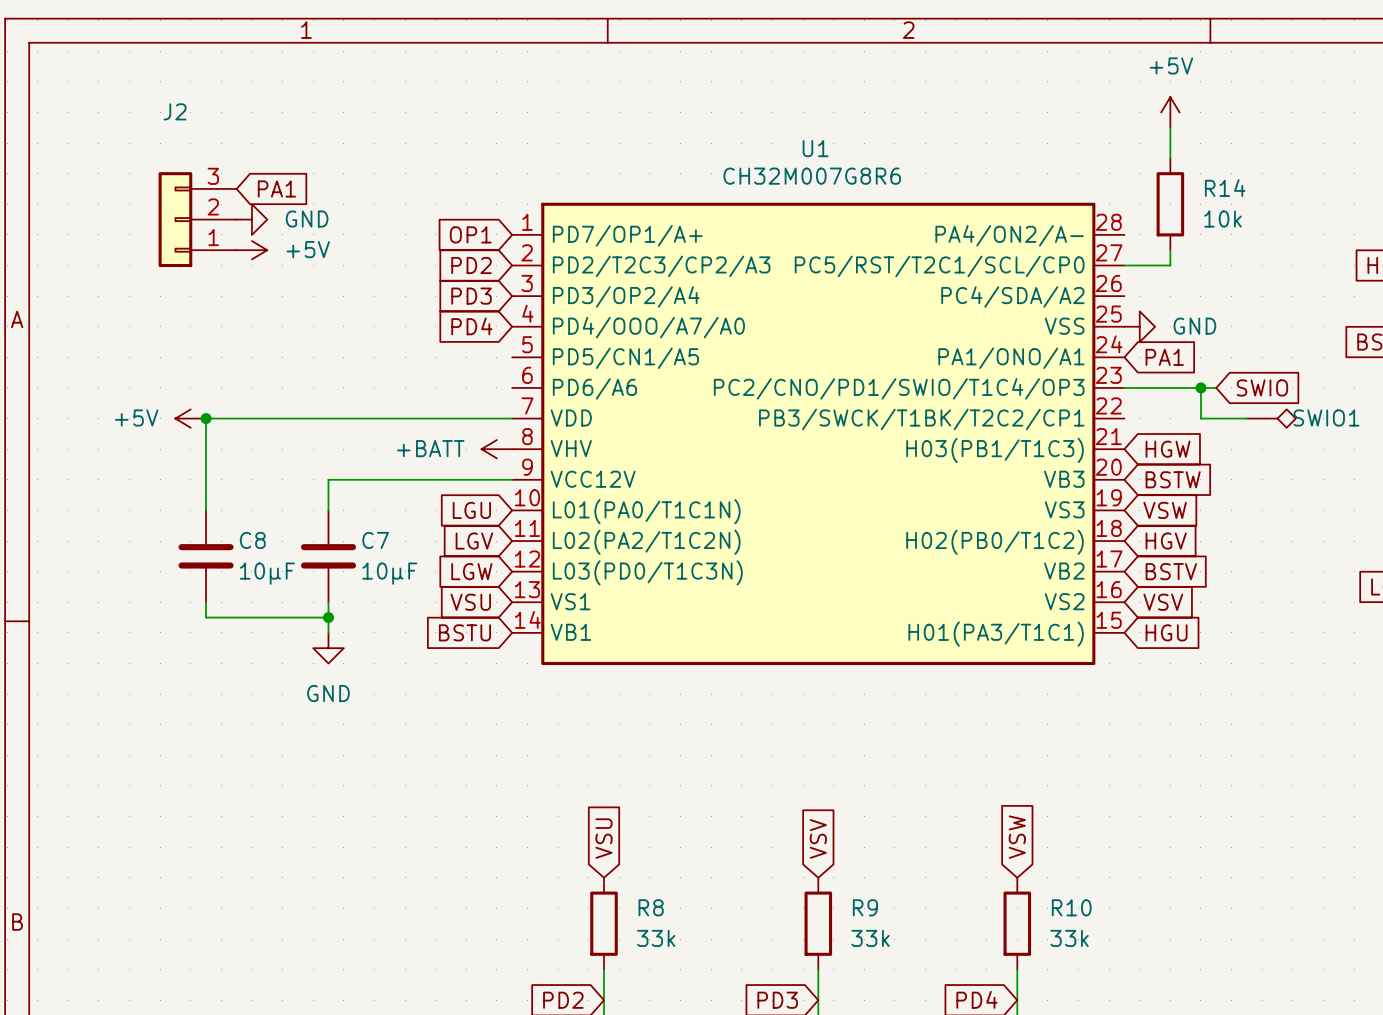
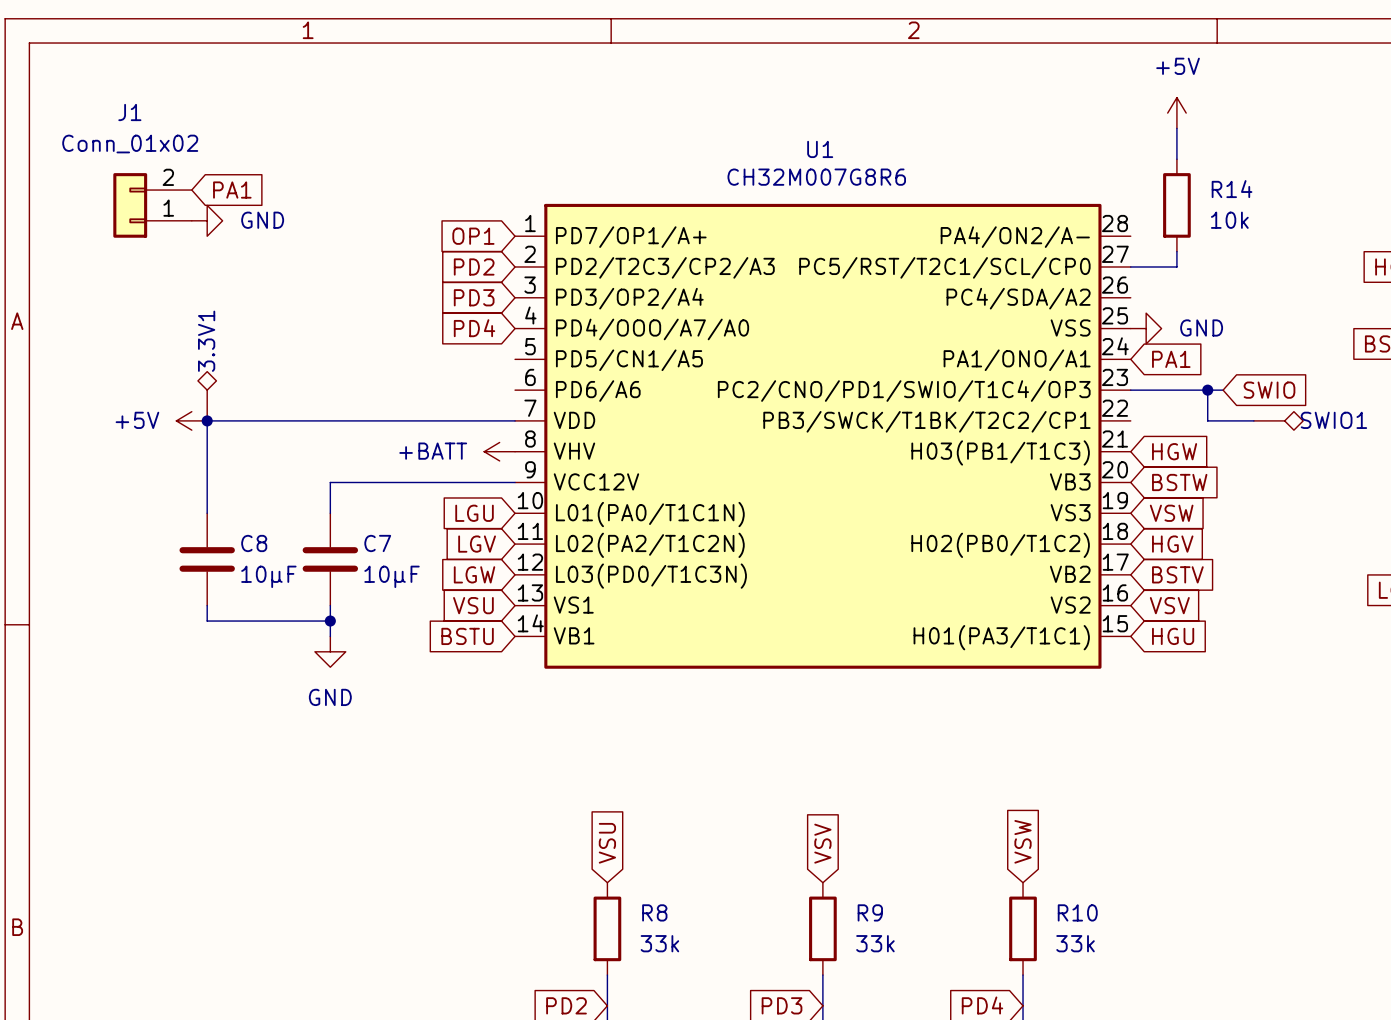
global label position: PA1 (276, 188) -> PA1 (232, 190)
J1: none -> Conn_01x02 (152, 205)
J2: (197, 219) -> none
power symbol position: GND (251, 219) -> GND (207, 220)
power symbol: +5V (251, 250) -> none
3.3V1: none -> (207, 396)

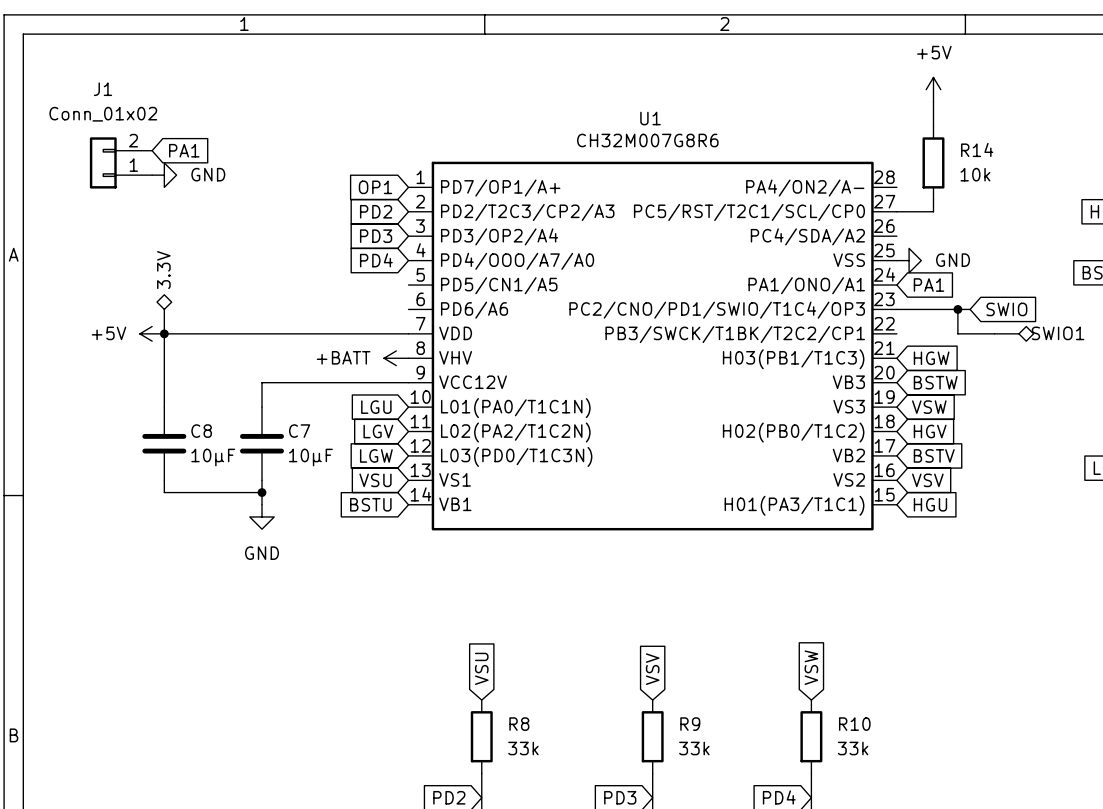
3.3V1 name: 3.3V1 (206, 341) -> 3.3V (163, 270)

